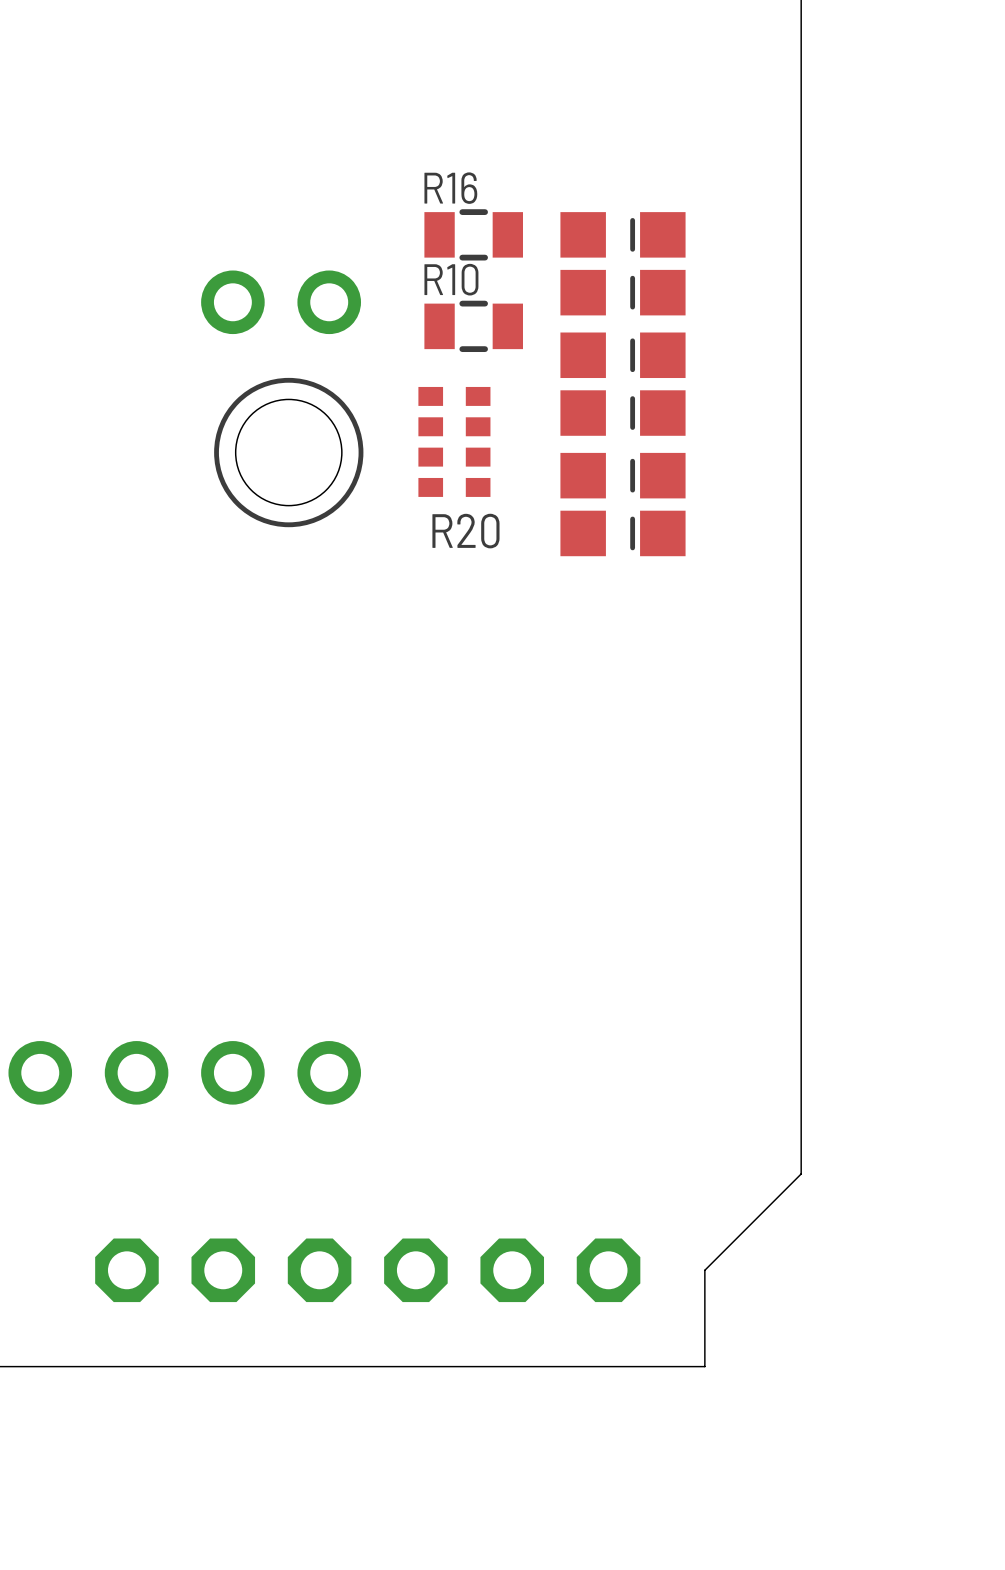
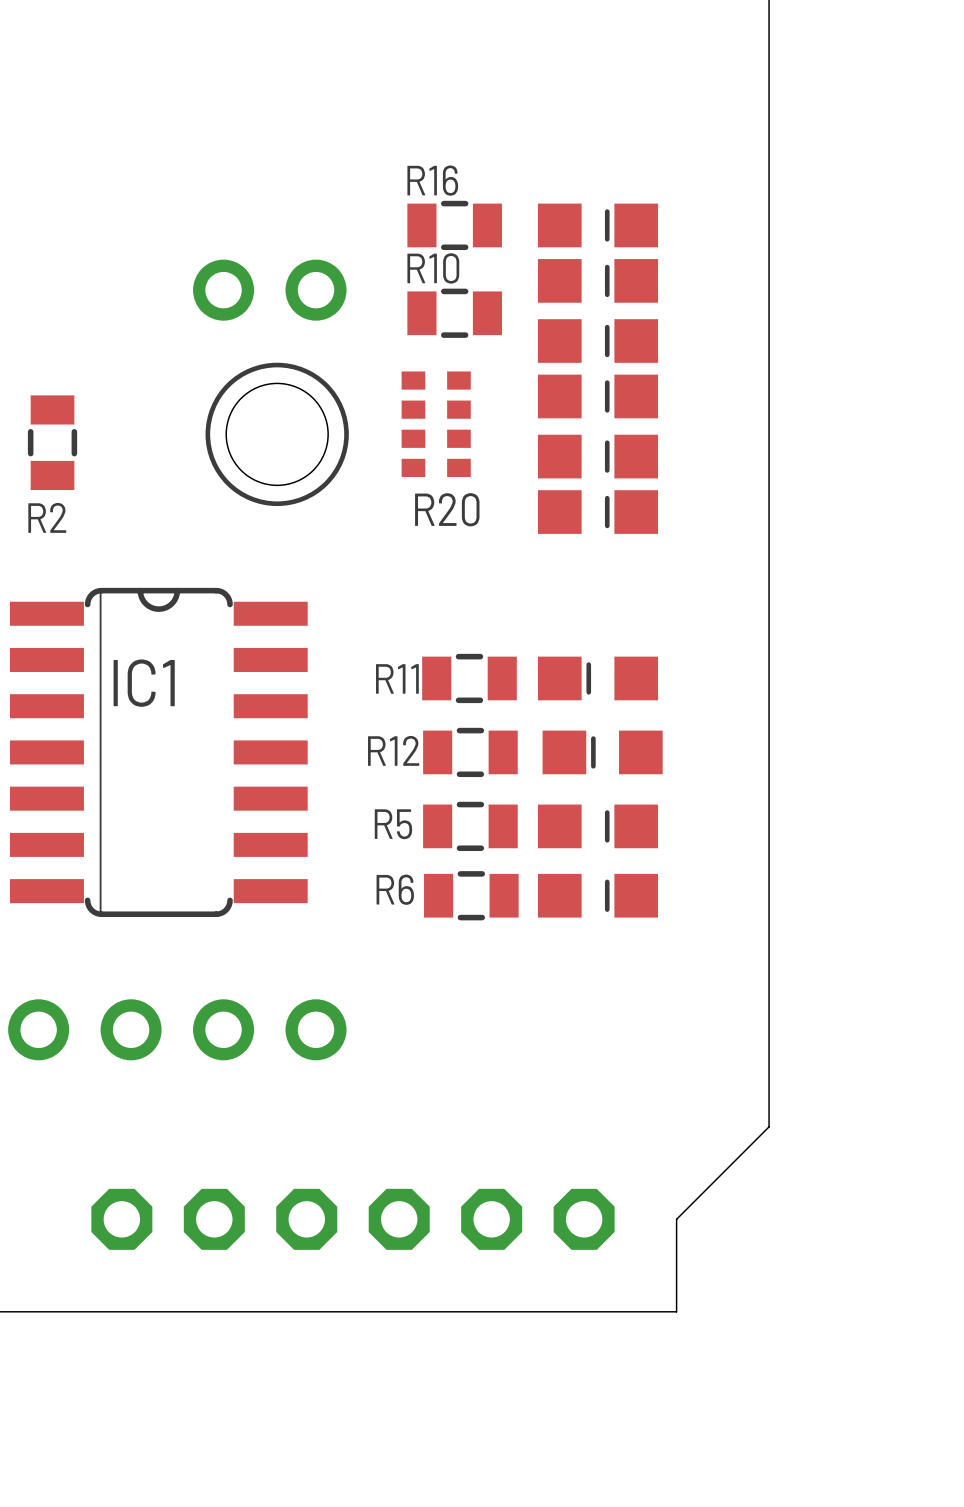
R2: none -> (52, 442)
R11: none -> (469, 678)
part: none -> (598, 678)
IC1: none -> (158, 752)
R12: none -> (470, 752)
part: none -> (602, 752)
R5: none -> (470, 826)
part: none -> (598, 826)
R6: none -> (471, 895)
part: none -> (598, 895)

